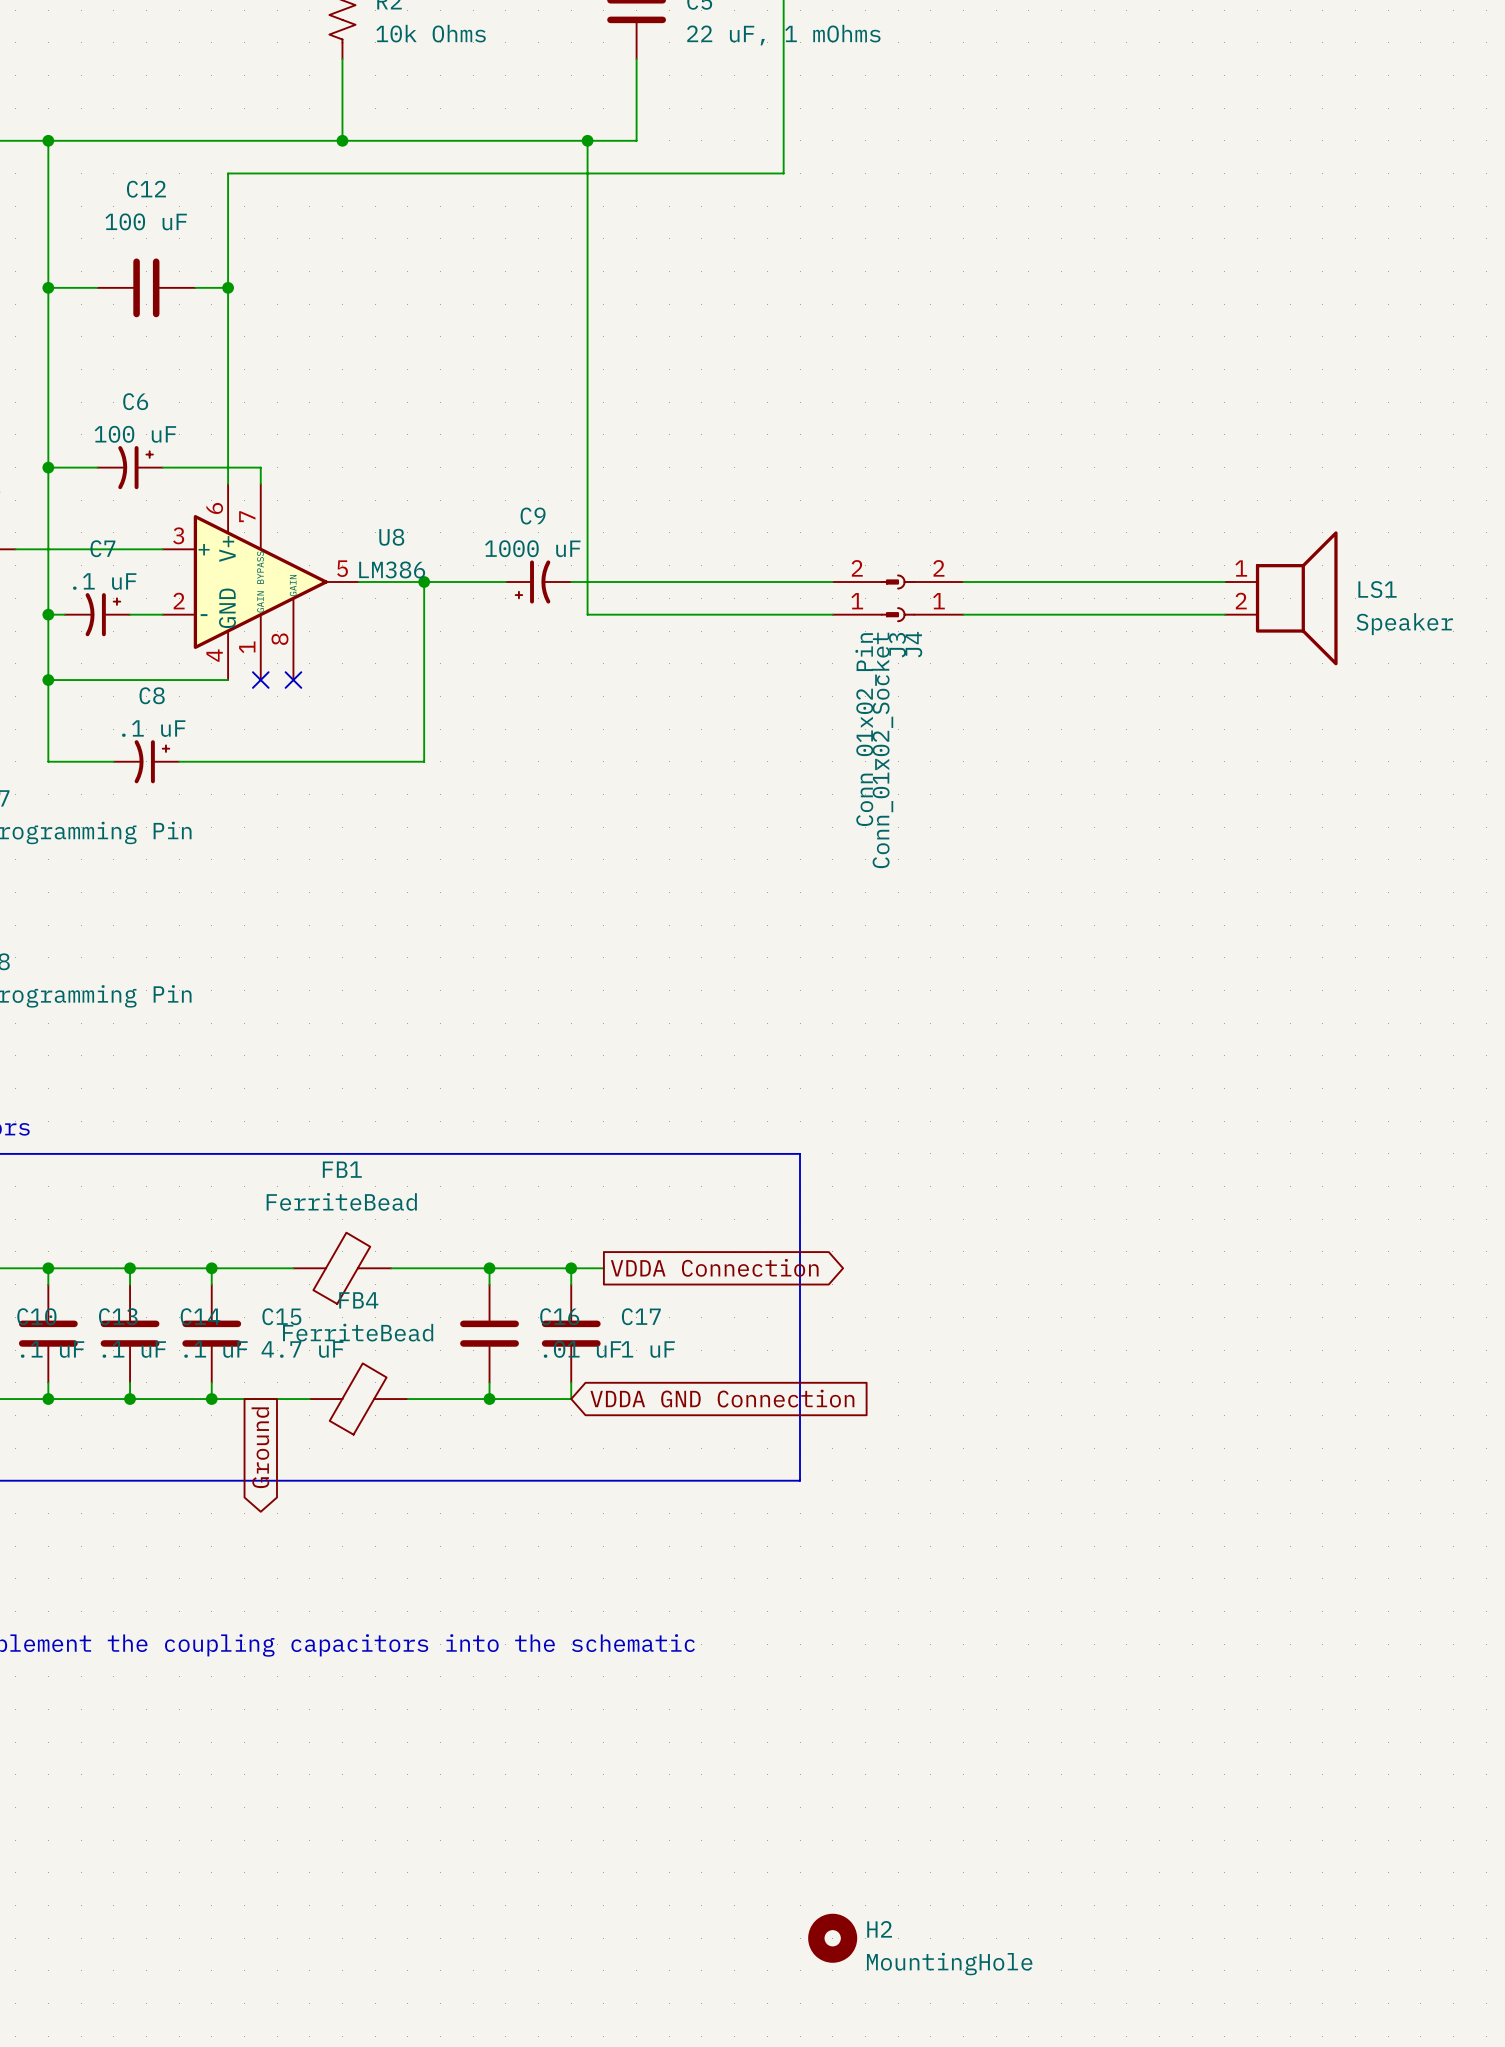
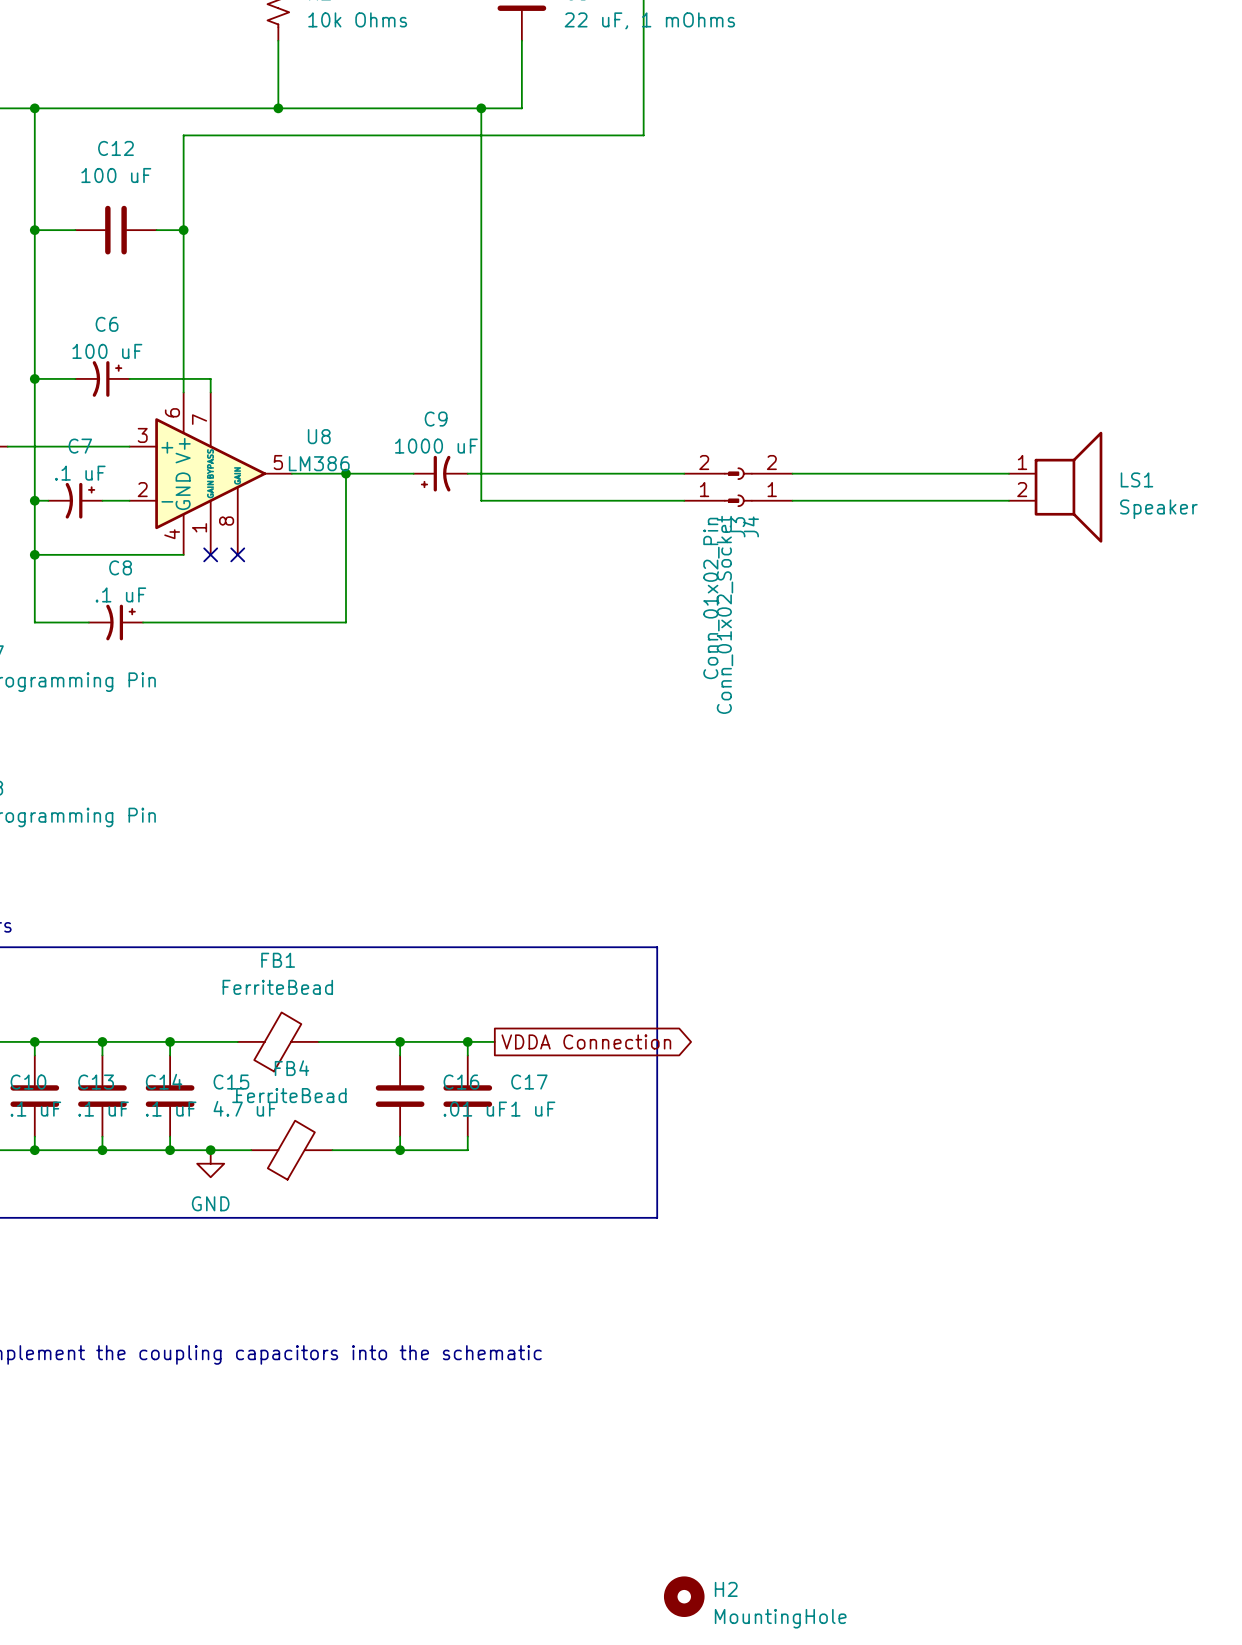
global label: VDDA GND Connection (722, 1398) -> none
junction: none -> (210, 1150)
power symbol: none -> GND (210, 1163)
global label: Ground (260, 1447) -> none

